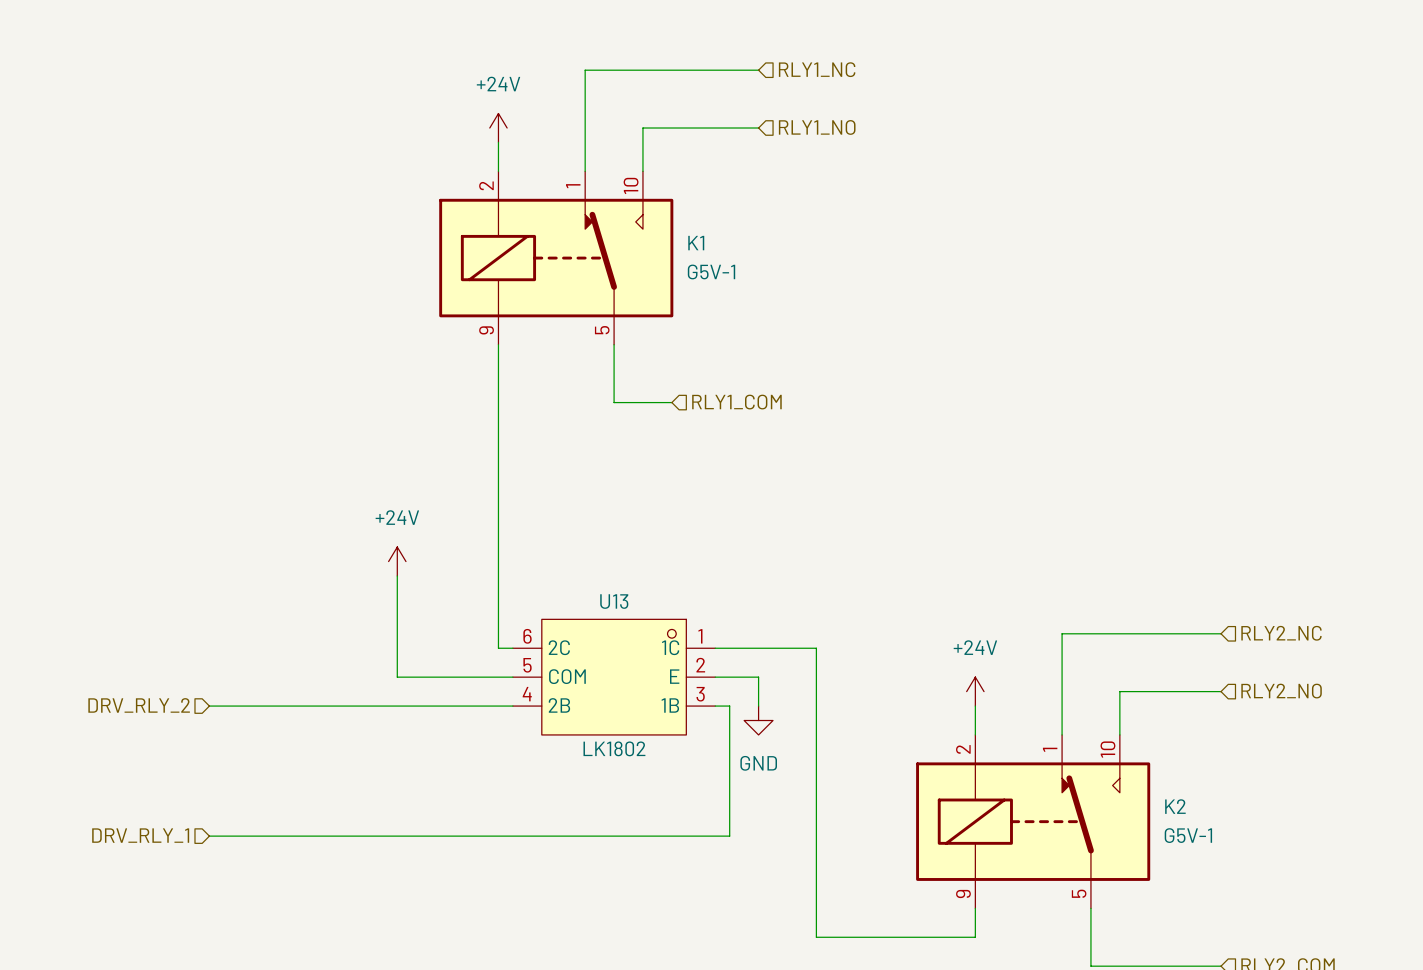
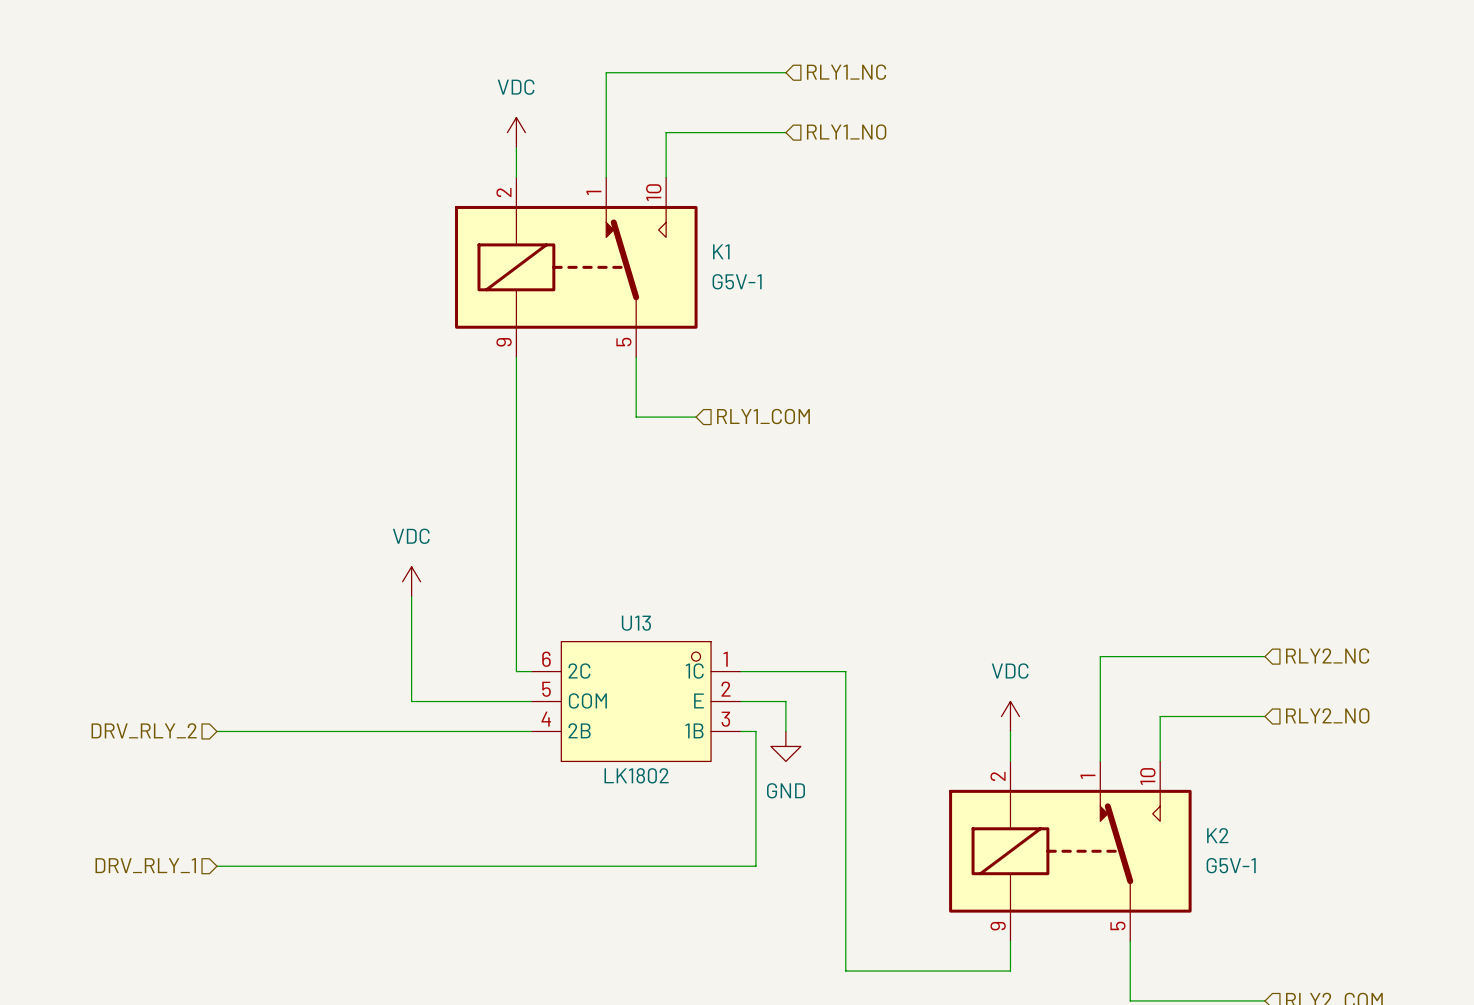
power symbol: +24V (498, 128) -> VDC (516, 132)
power symbol: +24V (397, 561) -> VDC (411, 581)
power symbol: +24V (975, 691) -> VDC (1010, 716)

